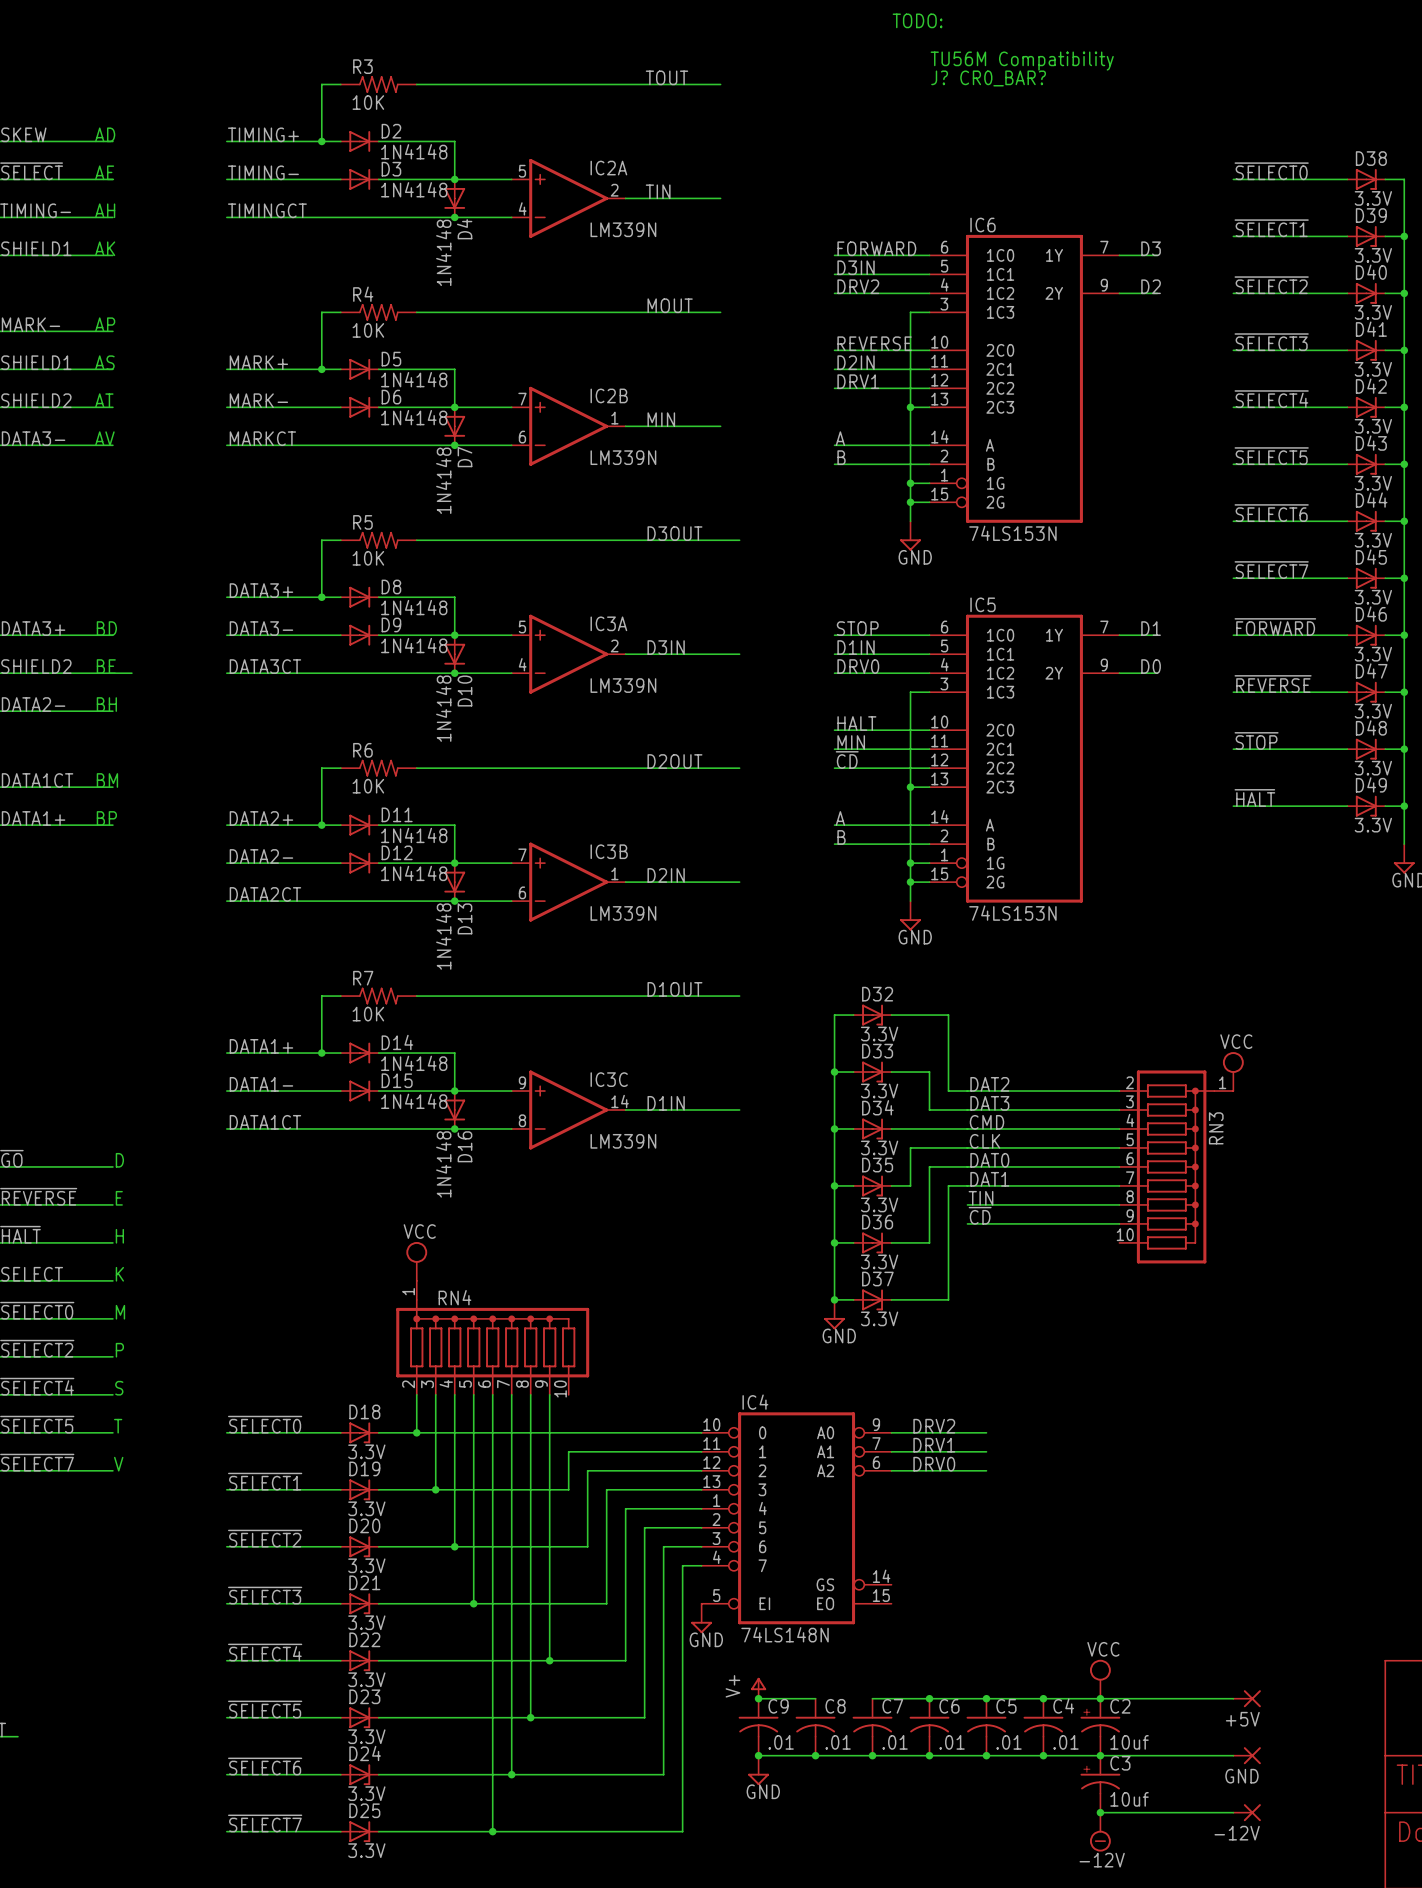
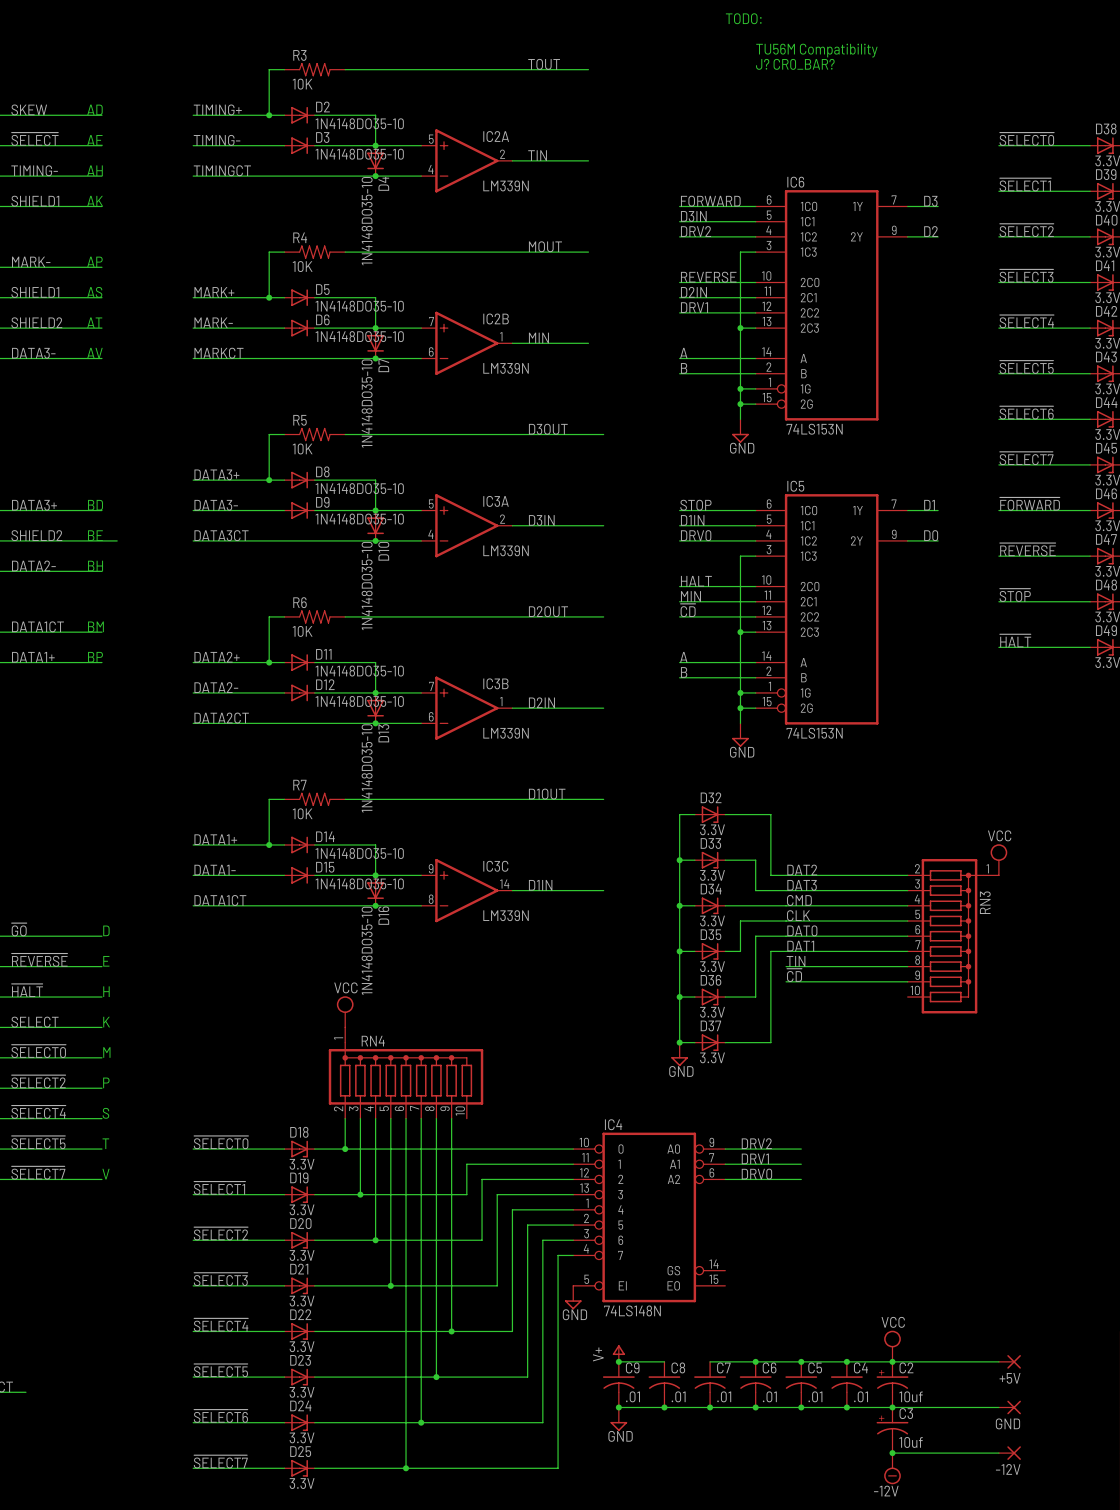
D2 value: 1N4148 (414, 151) -> 1N4148DO35-10 (359, 123)
D3 value: 1N4148 (414, 189) -> 1N4148DO35-10 (359, 154)
D4 value: 1N4148 (443, 252) -> 1N4148DO35-10 (367, 221)
D5 value: 1N4148 (414, 379) -> 1N4148DO35-10 (359, 306)
D6 value: 1N4148 (414, 417) -> 1N4148DO35-10 (359, 336)
D7 value: 1N4148 (443, 480) -> 1N4148DO35-10 (367, 403)
D8 value: 1N4148 (414, 607) -> 1N4148DO35-10 (359, 488)
D9 value: 1N4148 (414, 645) -> 1N4148DO35-10 (359, 519)
D10 value: 1N4148 (443, 708) -> 1N4148DO35-10 (367, 586)
D11 value: 1N4148 (414, 835) -> 1N4148DO35-10 (359, 671)
D12 value: 1N4148 (414, 873) -> 1N4148DO35-10 (359, 701)
D13 value: 1N4148 (443, 936) -> 1N4148DO35-10 (367, 768)
D14 value: 1N4148 (414, 1063) -> 1N4148DO35-10 (359, 853)
D15 value: 1N4148 (414, 1101) -> 1N4148DO35-10 (359, 883)
D16 value: 1N4148 (443, 1164) -> 1N4148DO35-10 (367, 950)

